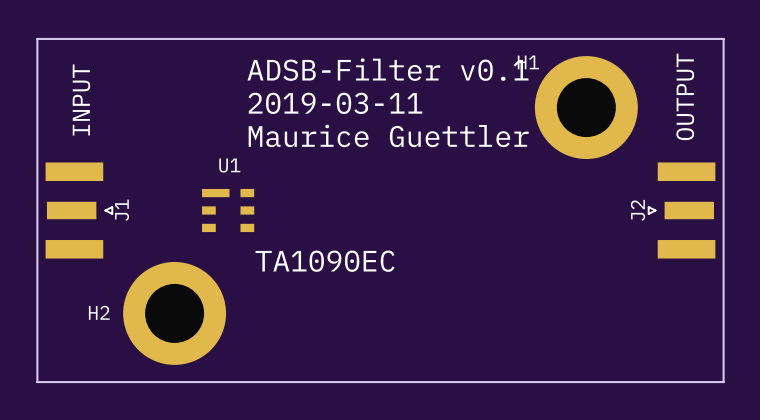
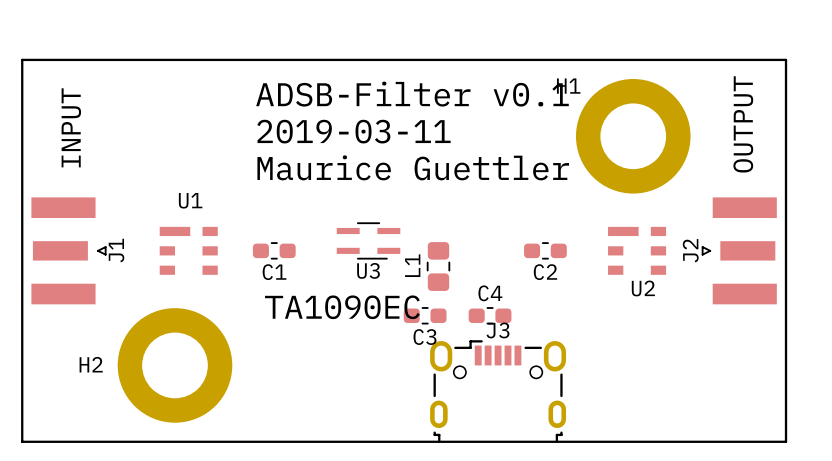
U3: none -> (368, 240)
U1 position: (228, 210) -> (188, 250)
C1: none -> (274, 250)
C2: none -> (545, 250)
U2: none -> (637, 250)
L1: none -> (438, 266)
C3: none -> (425, 315)
C4: none -> (490, 315)
J3: none -> (498, 391)

